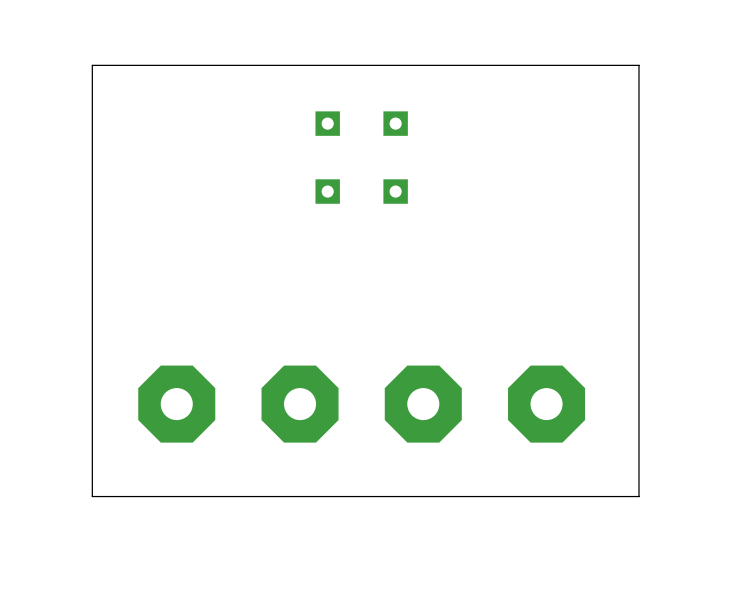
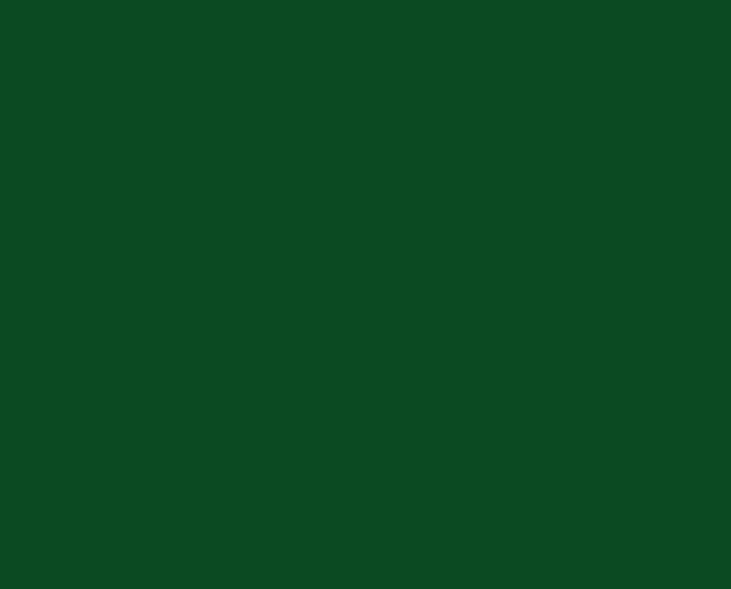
board edge: (639, 65) (92, 65) (92, 496) (639, 496) (639, 65) -> none
part: (361, 157) -> none
part: (176, 404) -> none
part: (300, 404) -> none
part: (423, 404) -> none
part: (546, 404) -> none

